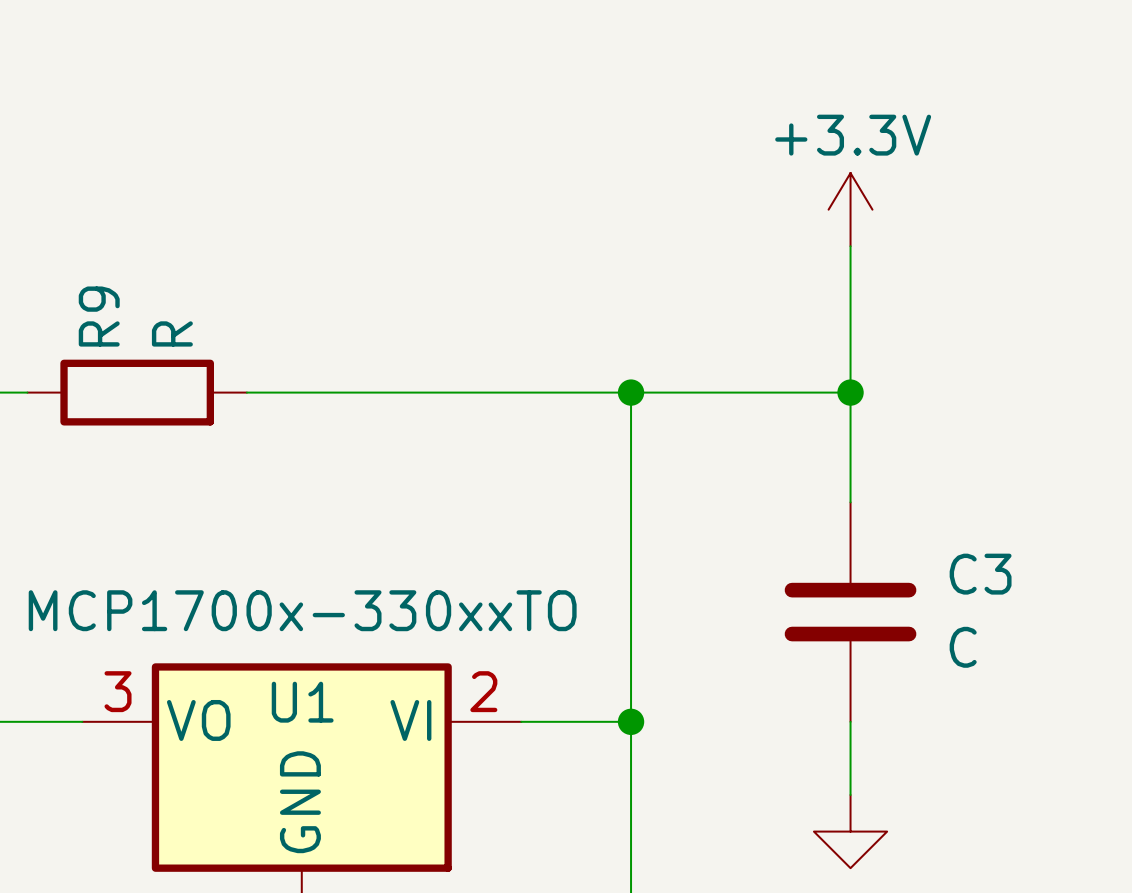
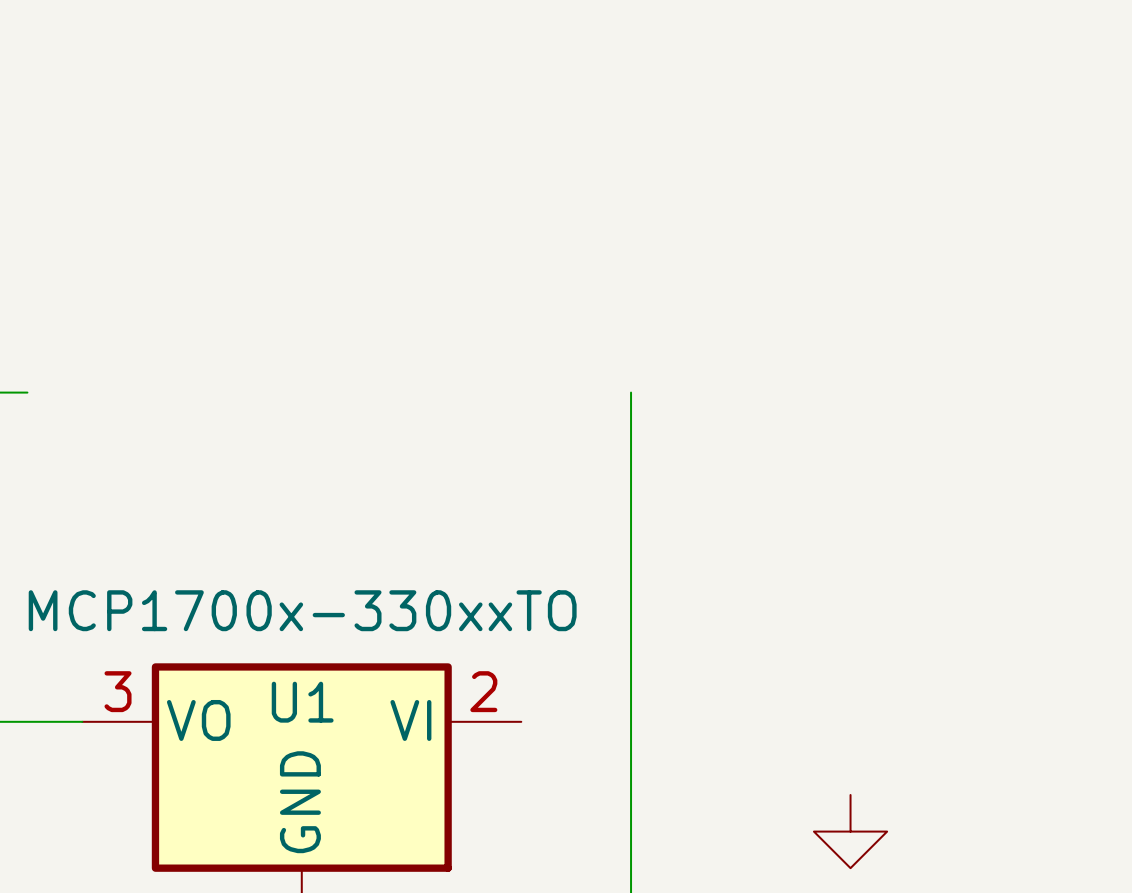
power symbol: +3.3V (850, 209) -> none
wire: (850, 246) (850, 502) -> none
R9: R (137, 392) -> none
wire: (246, 392) (850, 392) -> none
junction: (631, 392) -> none
junction: (850, 392) -> none
C3: C (850, 612) -> none
wire: (521, 721) (631, 721) -> none
junction: (631, 721) -> none
wire: (850, 721) (850, 795) -> none

